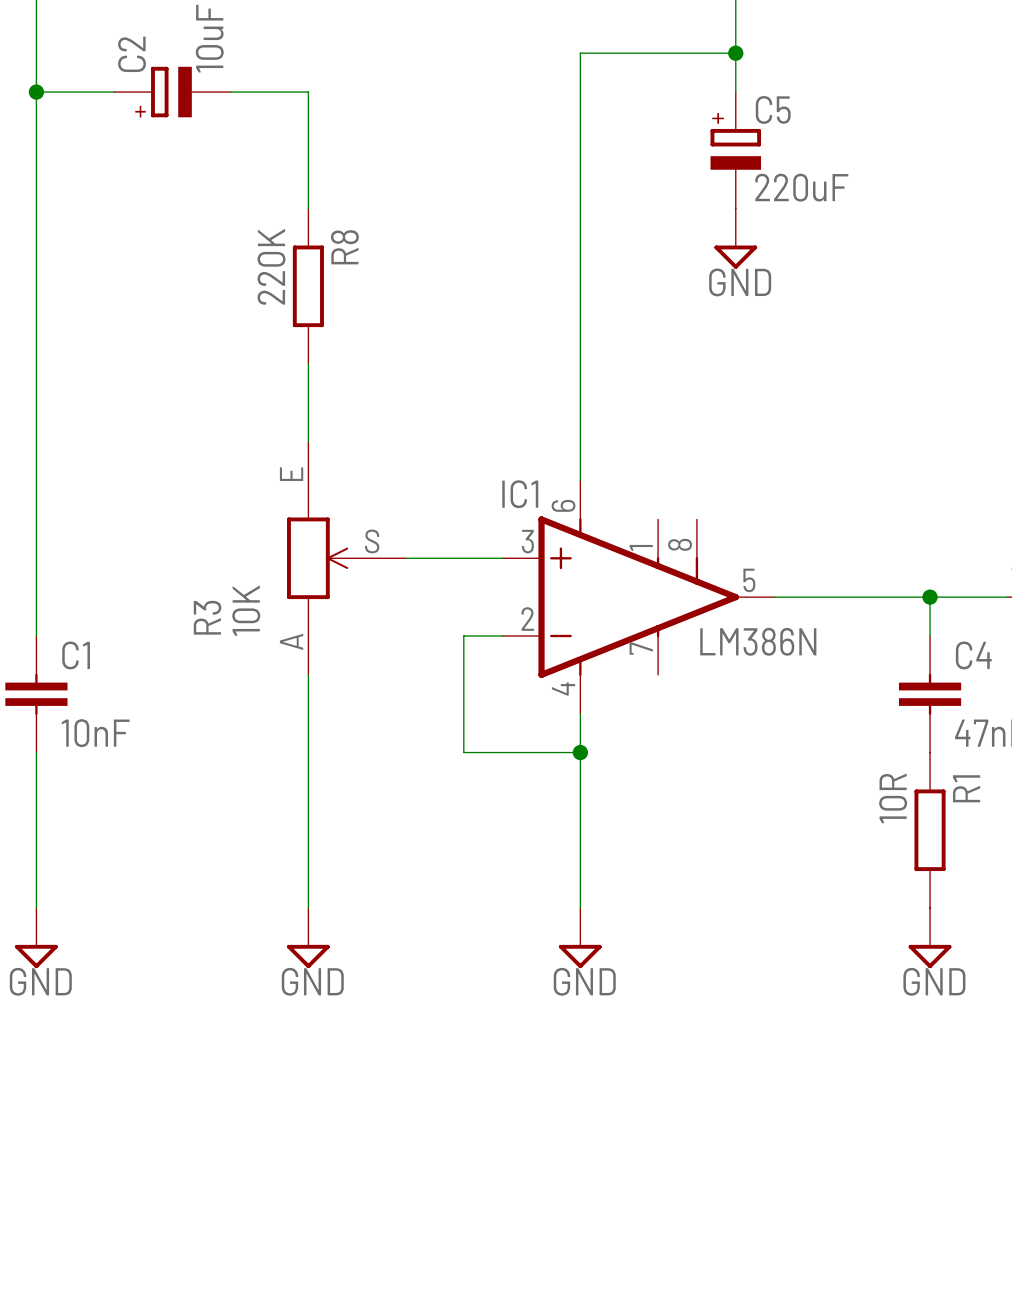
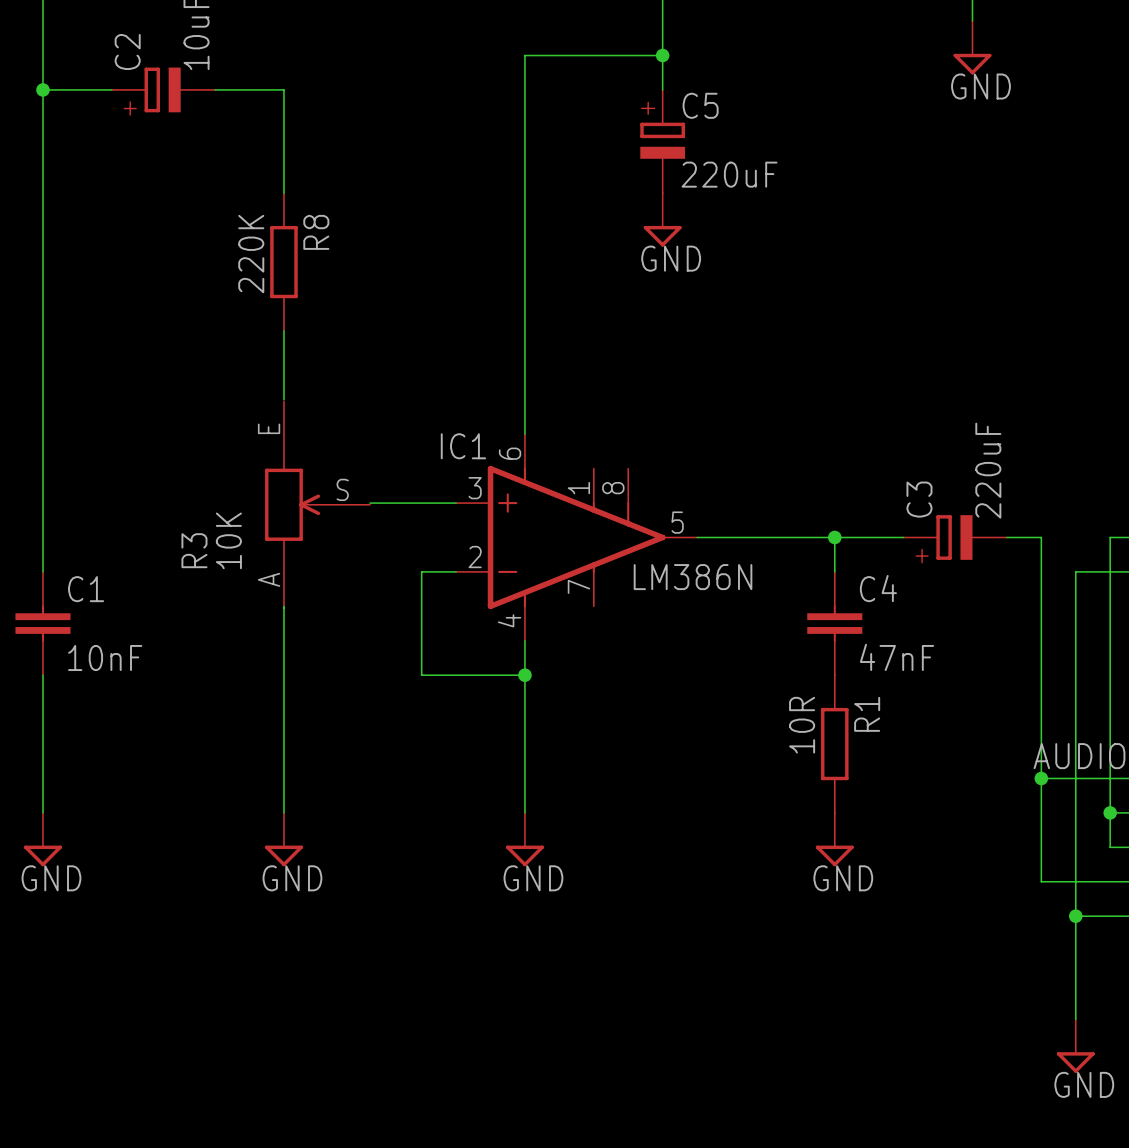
R3 symbol: [287, 441, 406, 675] -> [265, 401, 371, 609]

